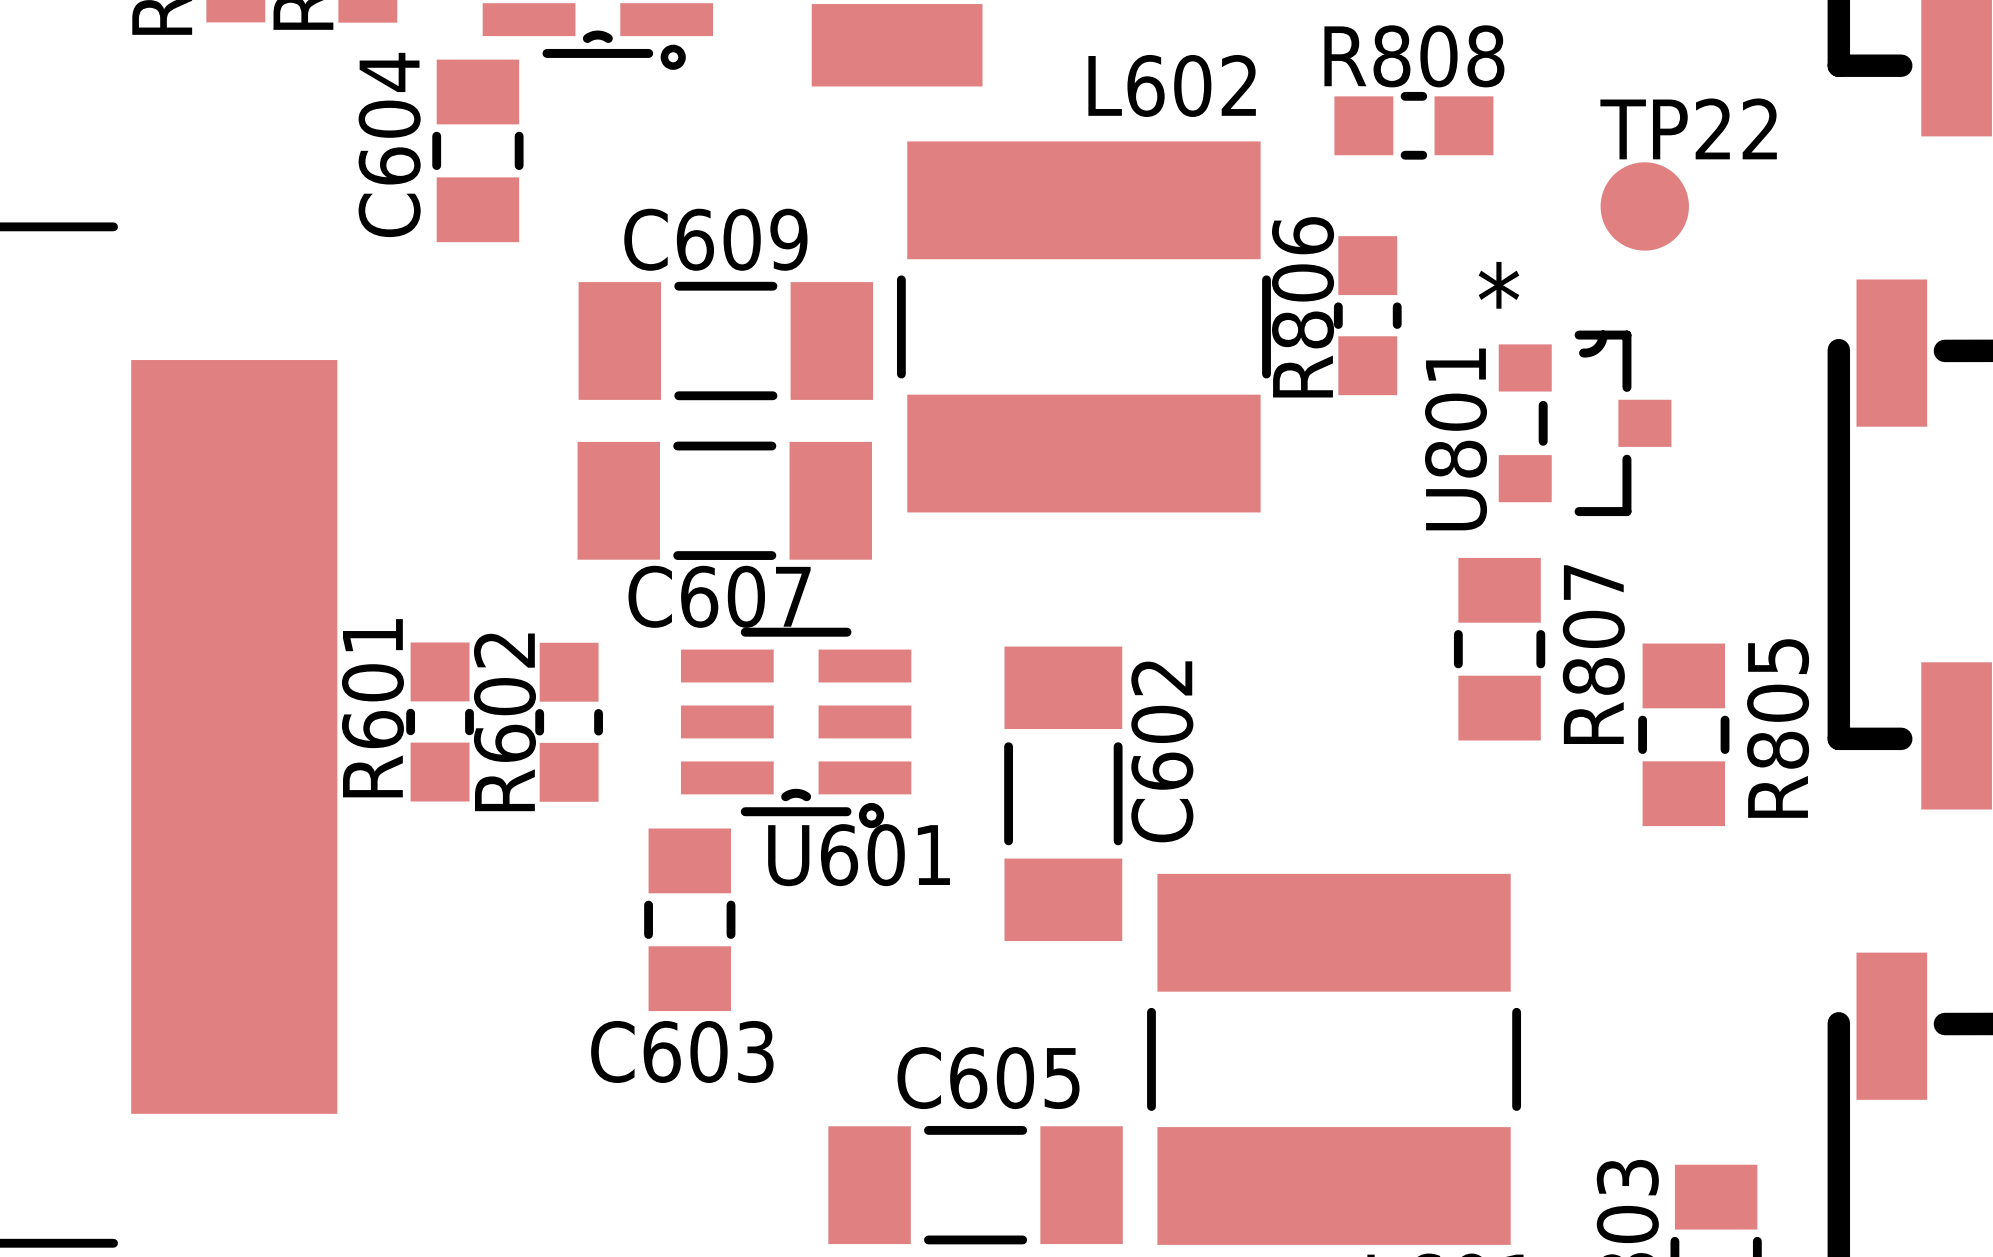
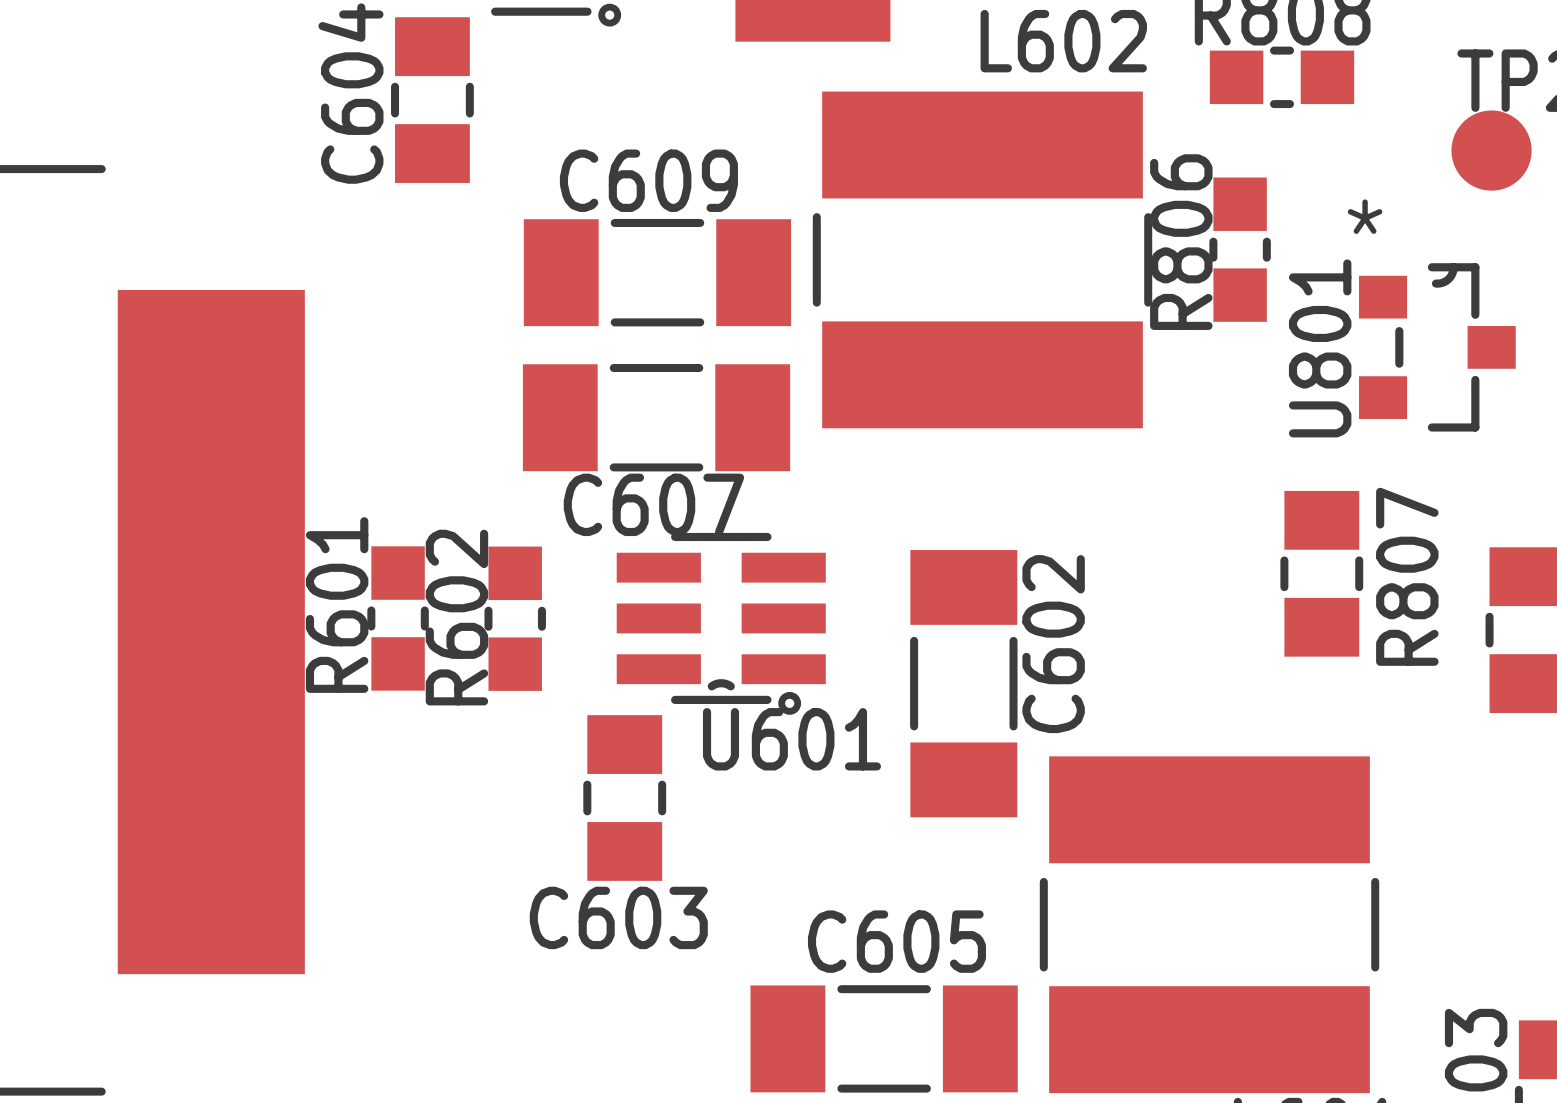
R807 position: (1499, 649) -> (1321, 573)

